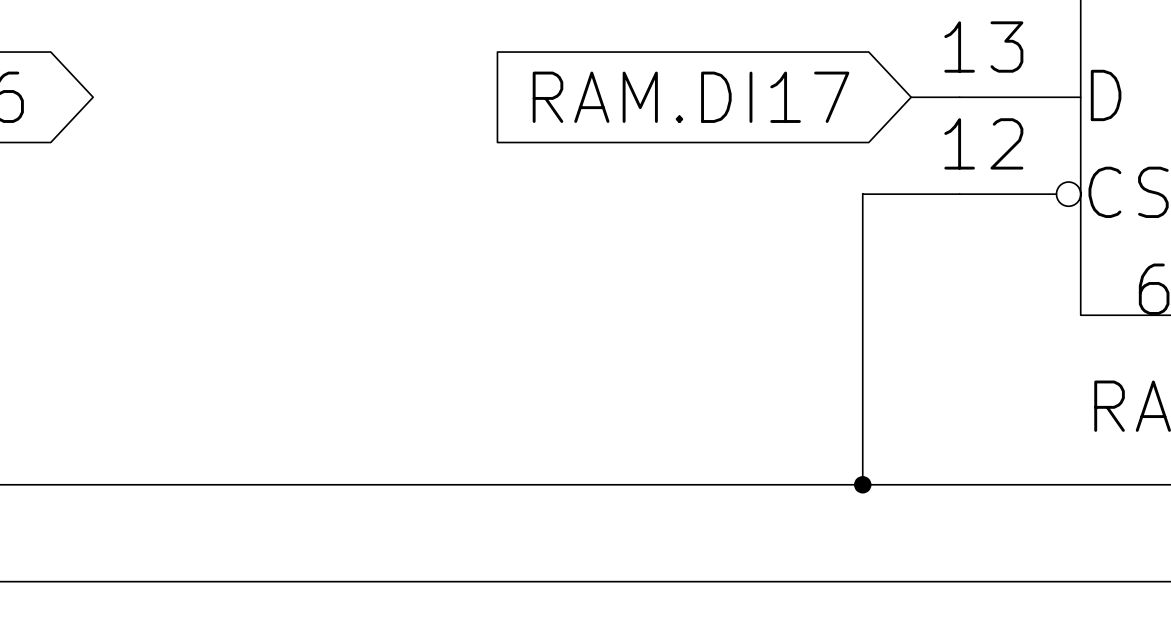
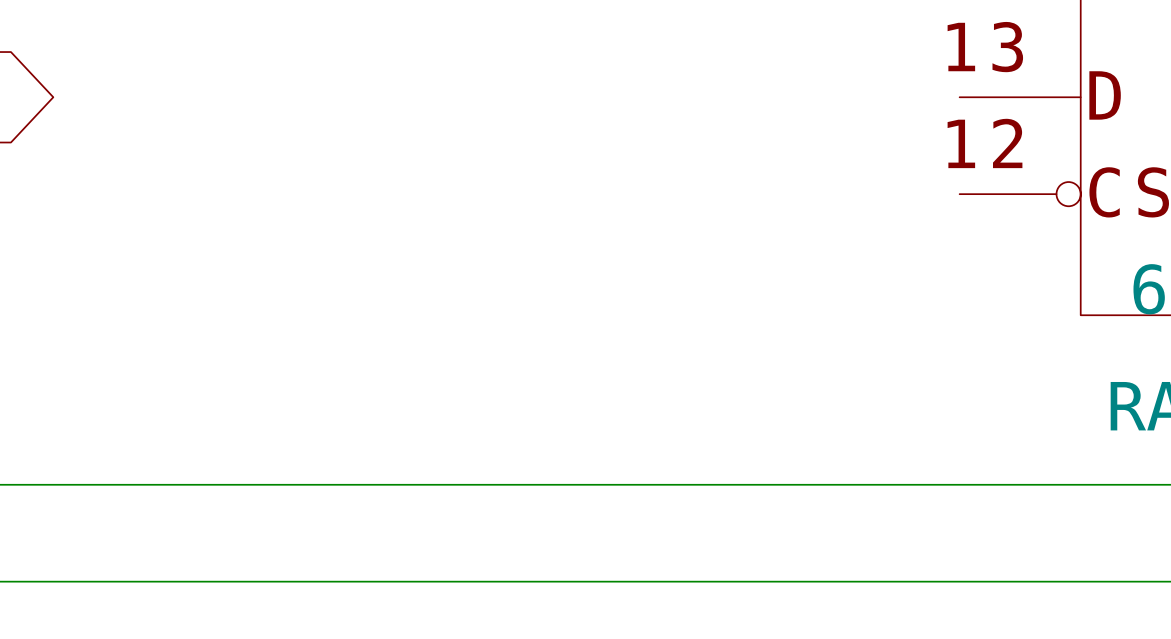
global label: RAM.DI17 (691, 97) -> none
wire: (911, 97) (959, 97) -> none
wire: (959, 194) (862, 194) (862, 484) -> none
junction: (862, 484) -> none

